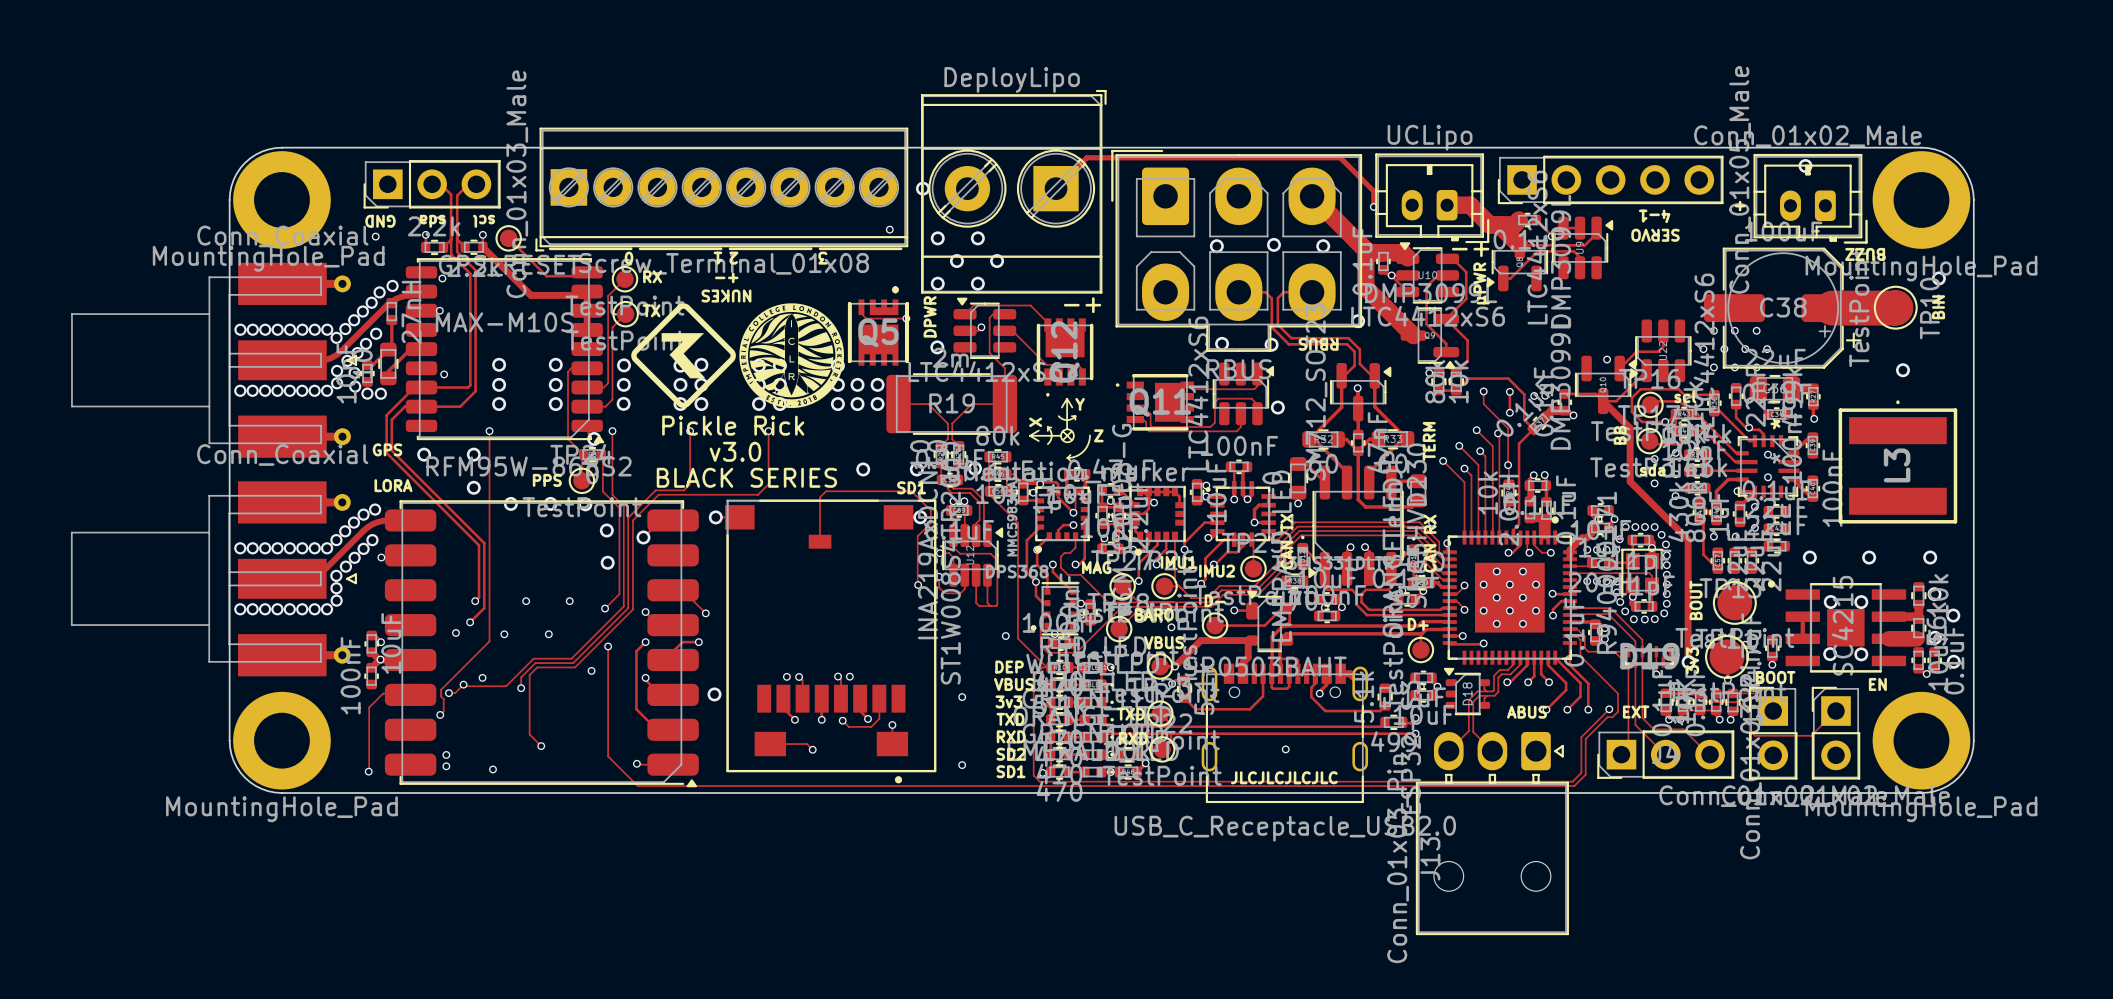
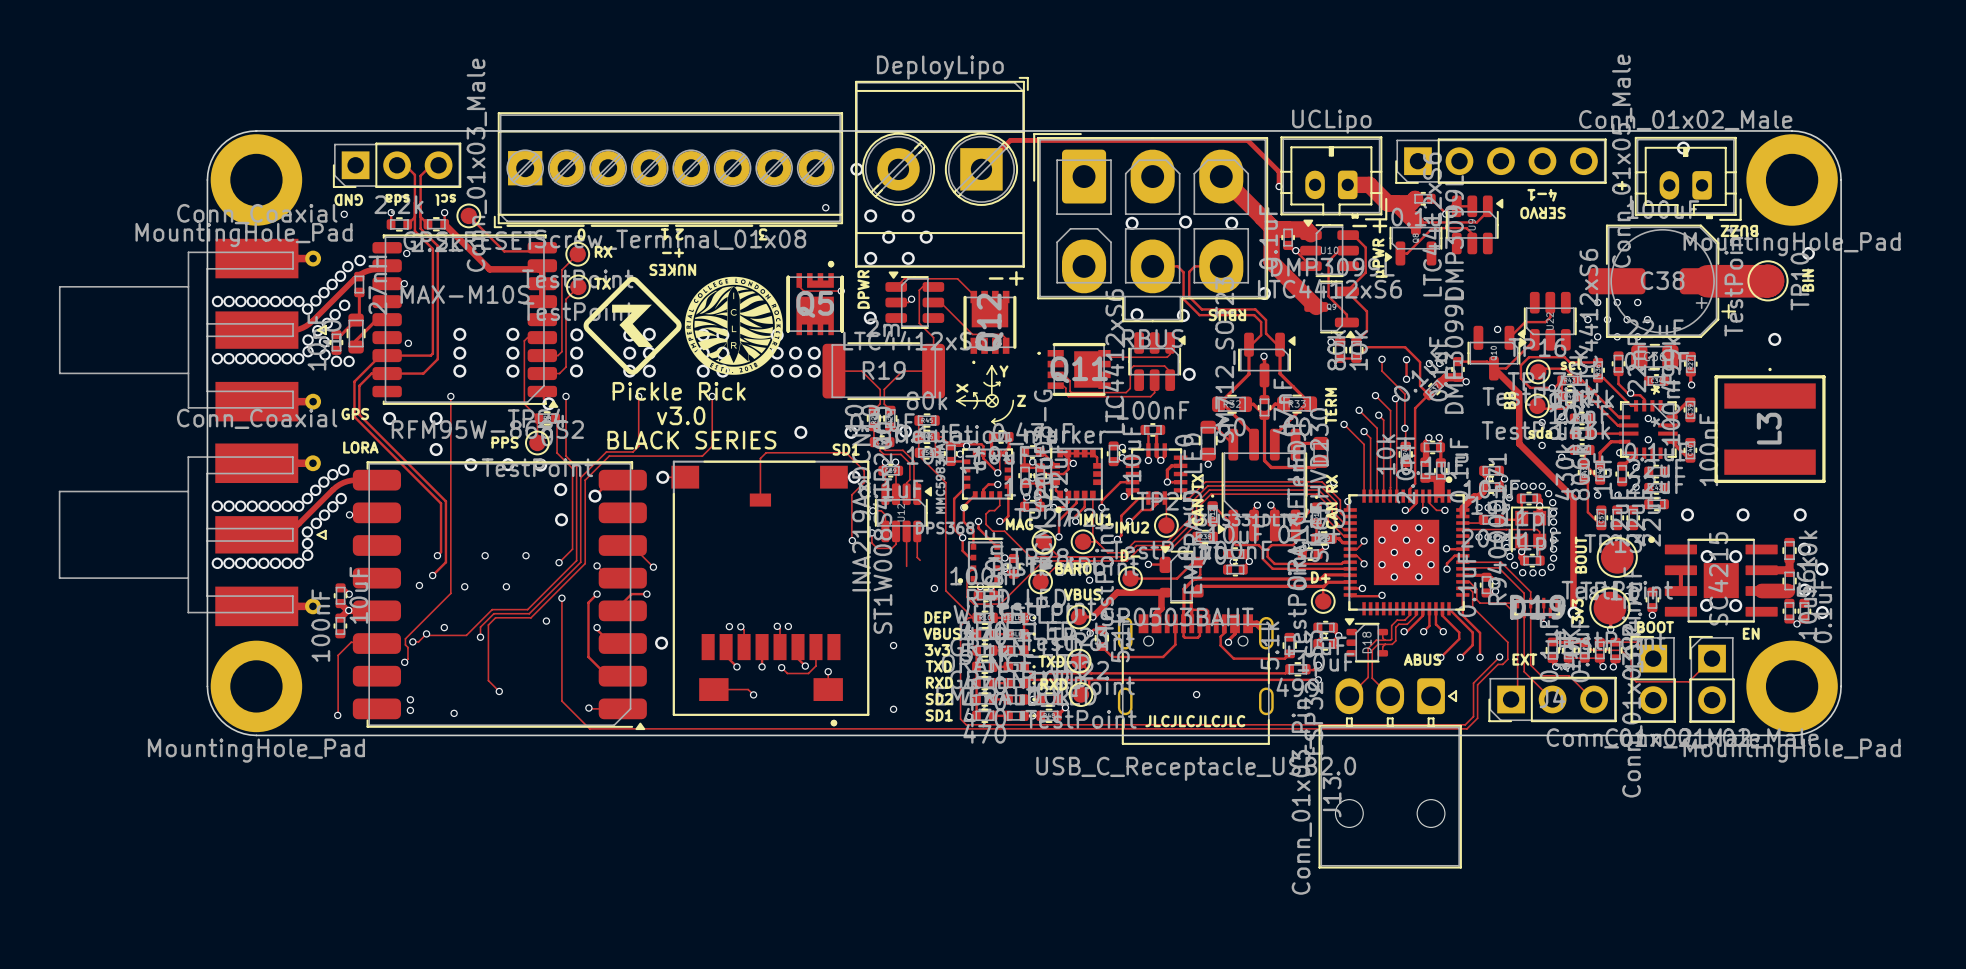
track: (953, 535) (953, 547) (960, 553) (990, 553) (997, 560) (997, 604) (979, 606) (976, 602) -> (906, 566) (906, 557)

